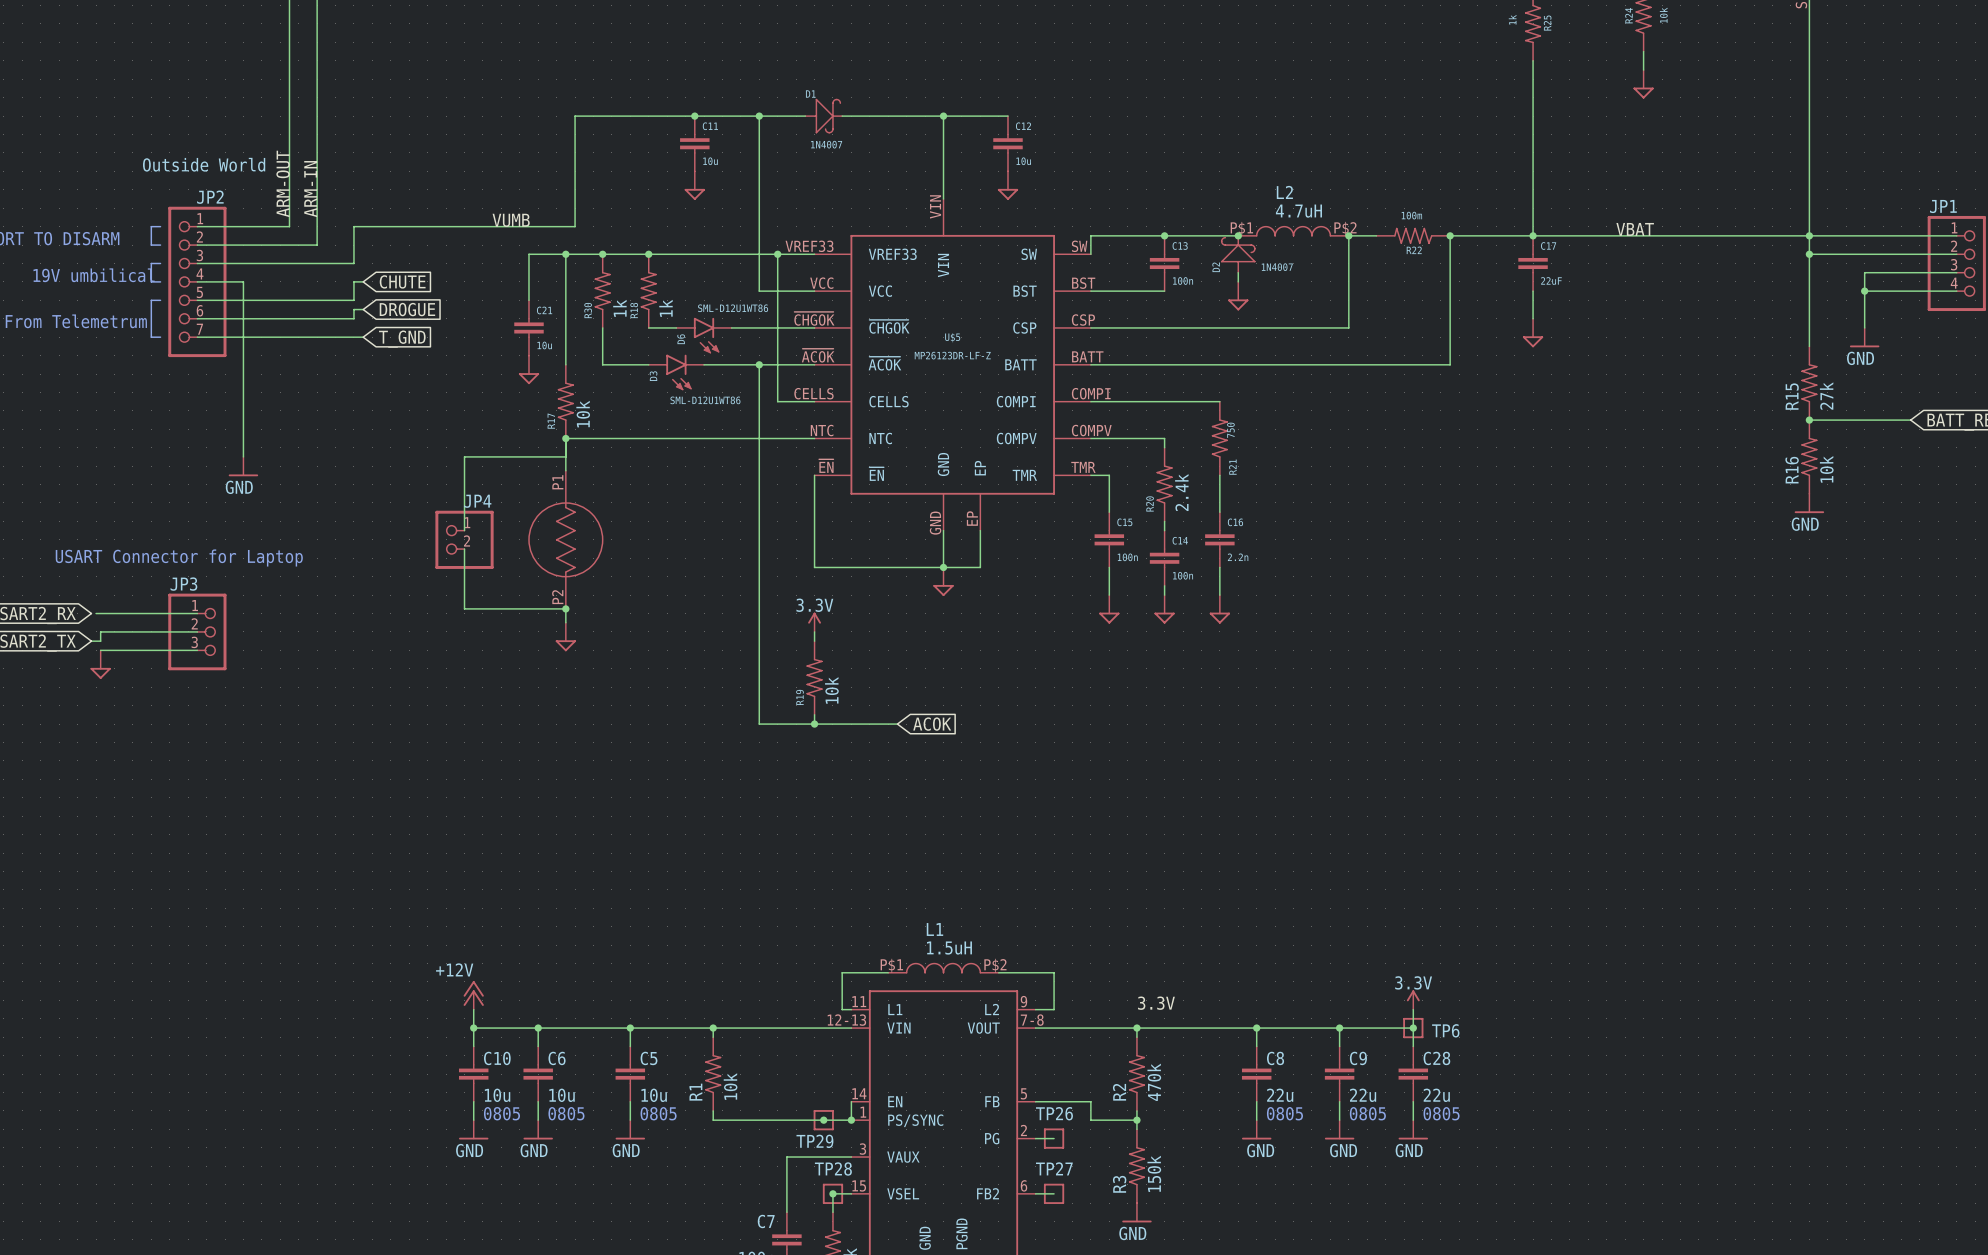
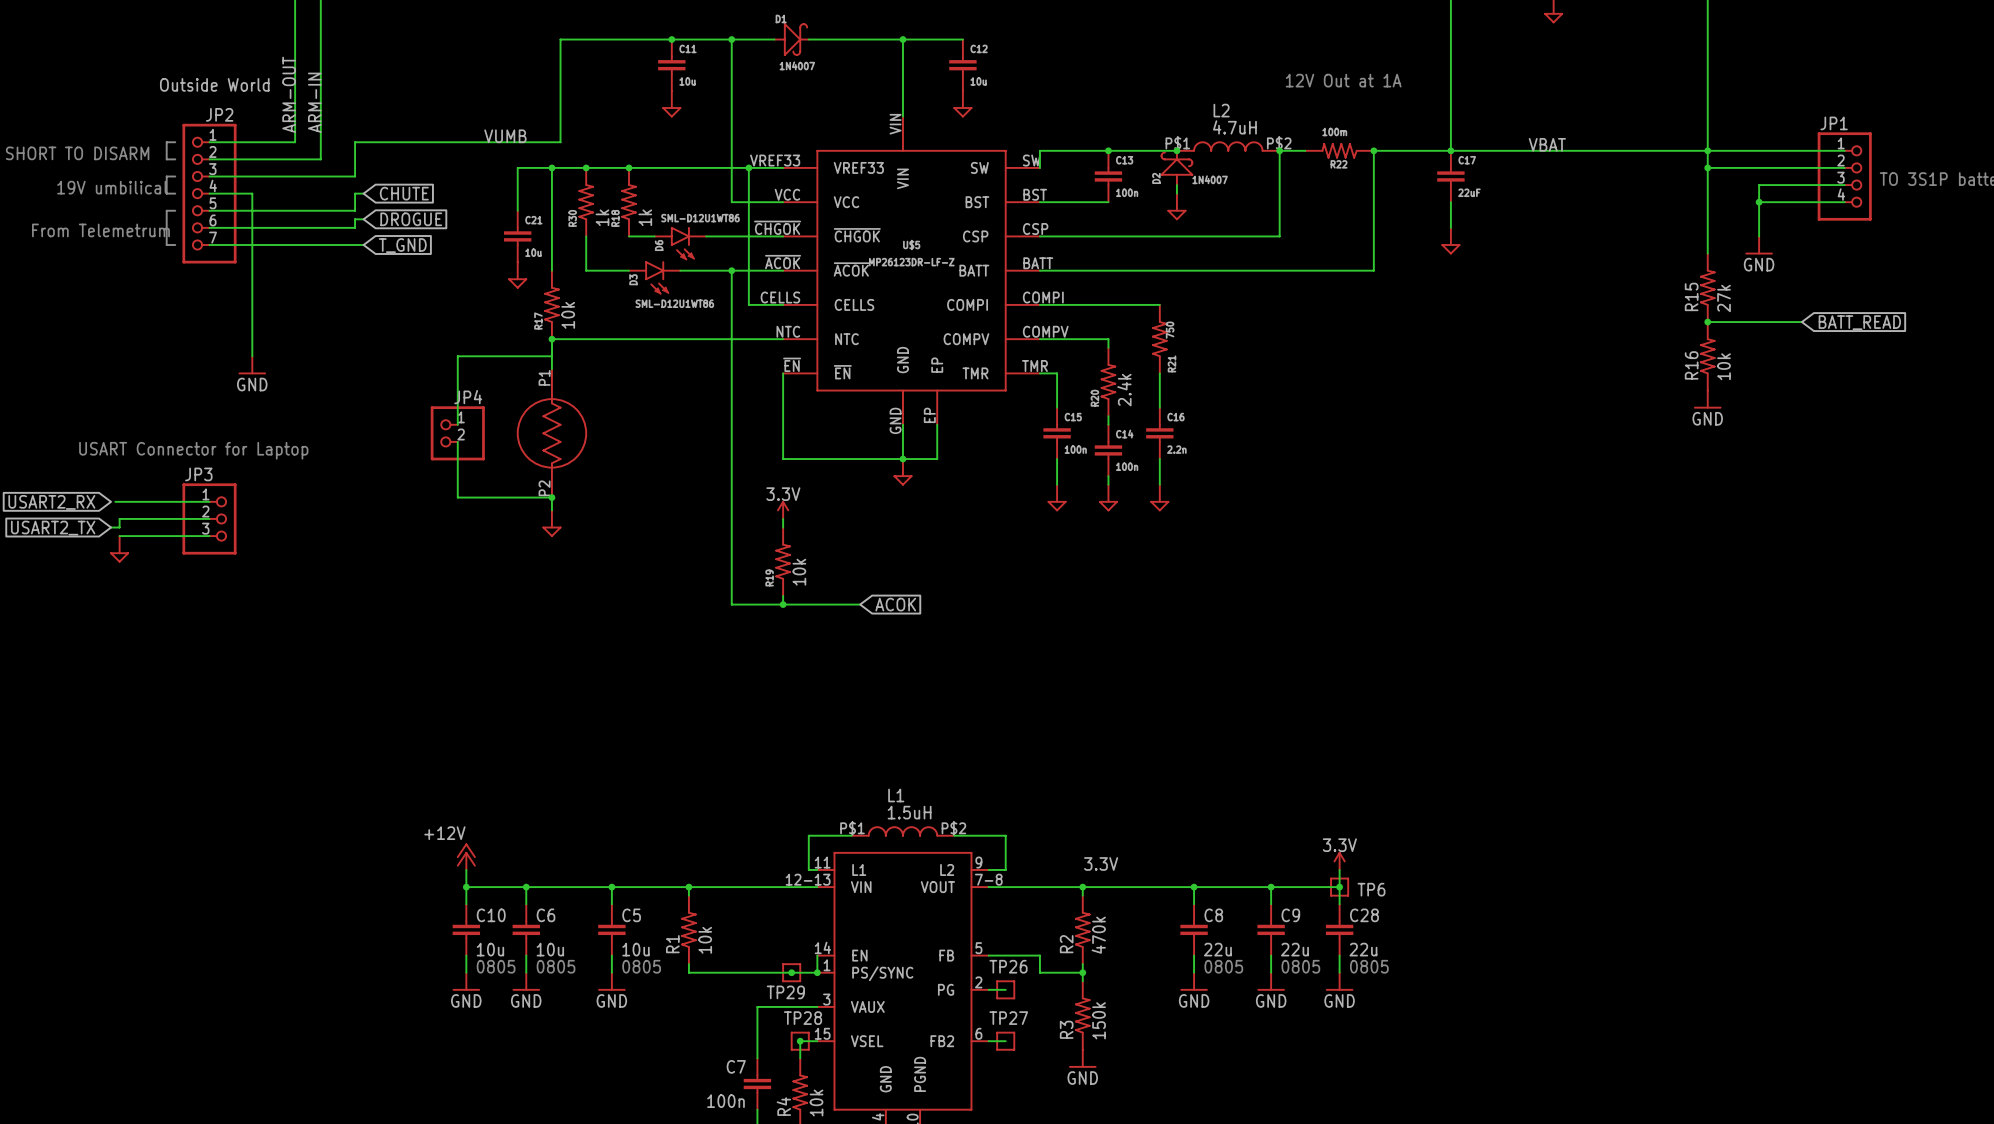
text: none -> 12V Out at 1A (1343, 80)

